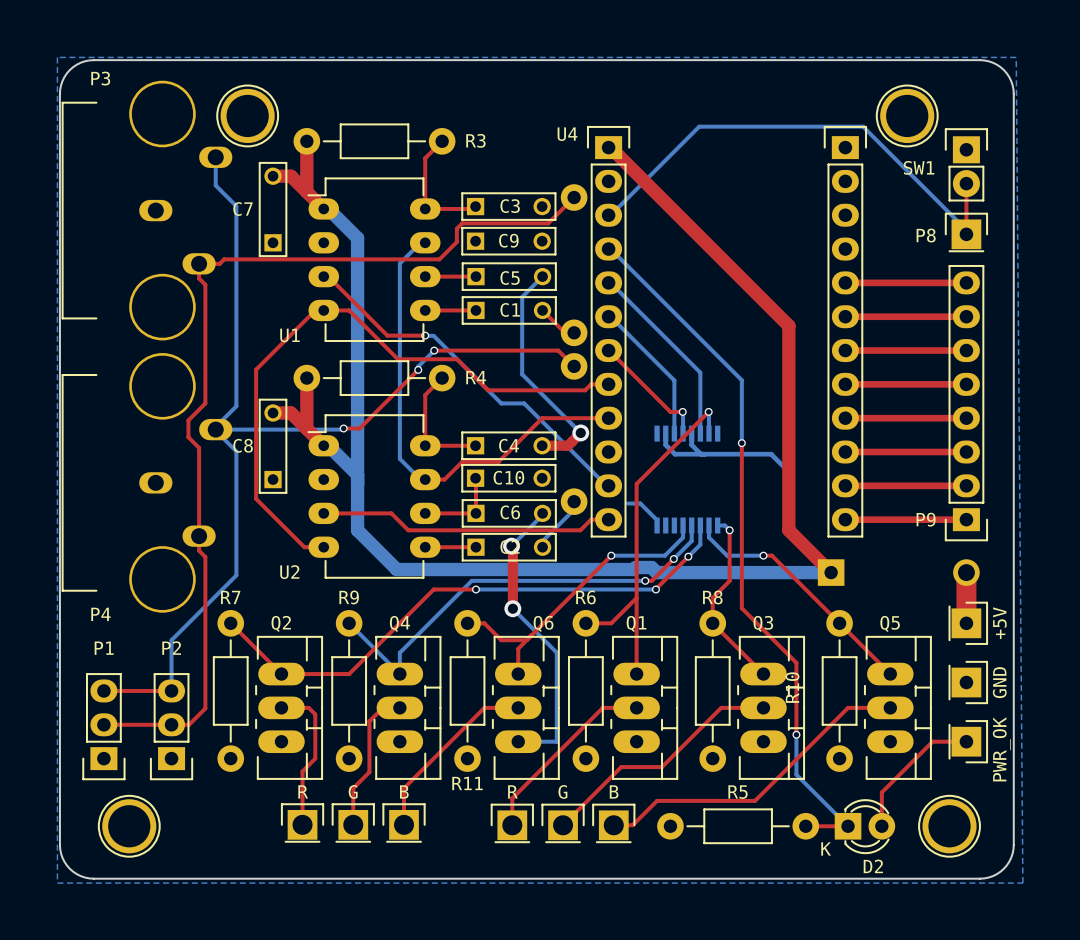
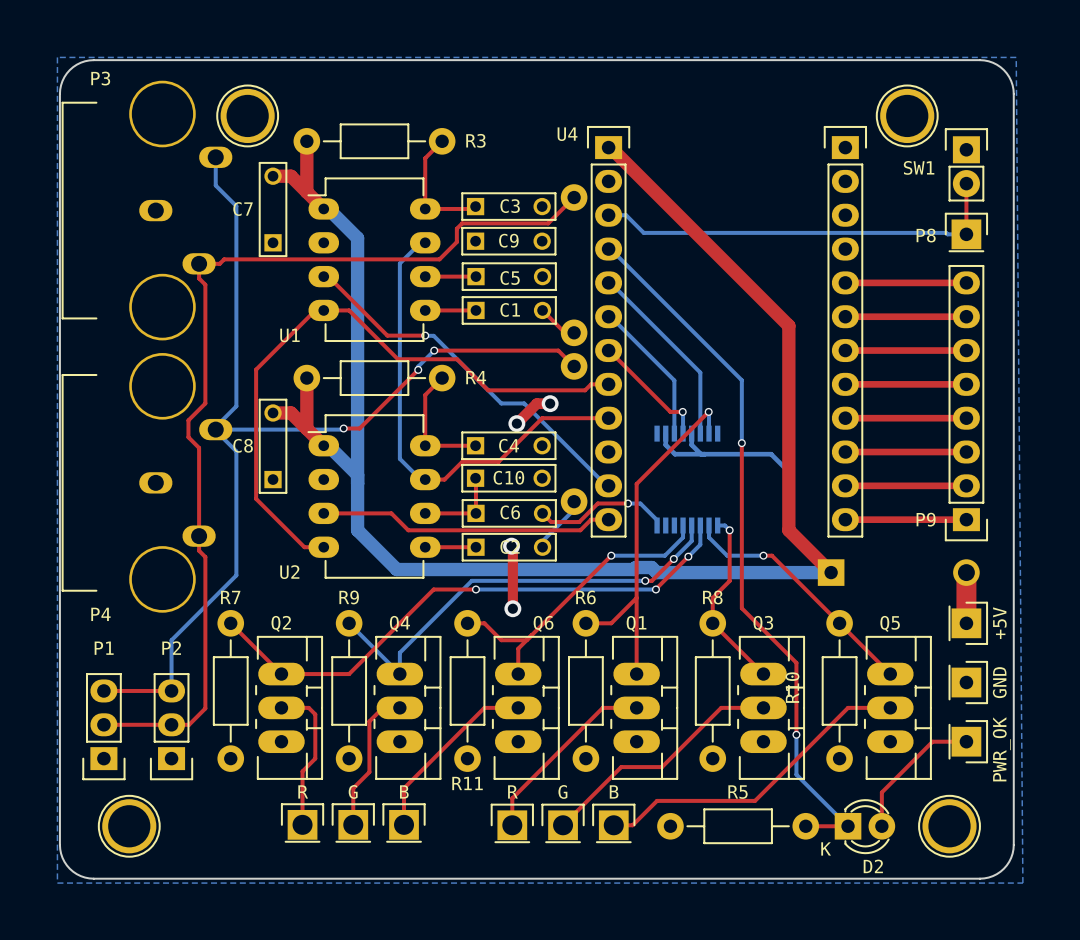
bottom track: (610, 215) (699, 126) (863, 126) (966, 230) (966, 234) -> (610, 215) (626, 215) (643, 232) (966, 234)
bottom track: (542, 276) (522, 296) (522, 374) (580, 432) -> none
top track: none -> (550, 403) (536, 403) (516, 423)
via: none -> (550, 403)
via: none -> (516, 423)
top track: (580, 432) (567, 445) (542, 445) -> none
via: (580, 432) -> none
top track: none -> (627, 503) (597, 503) (579, 522) (551, 522) (542, 513)
via: none -> (627, 503)
bottom track: (542, 513) (511, 546) -> none
bottom track: (512, 608) (556, 652) (556, 741) (518, 741) -> none

